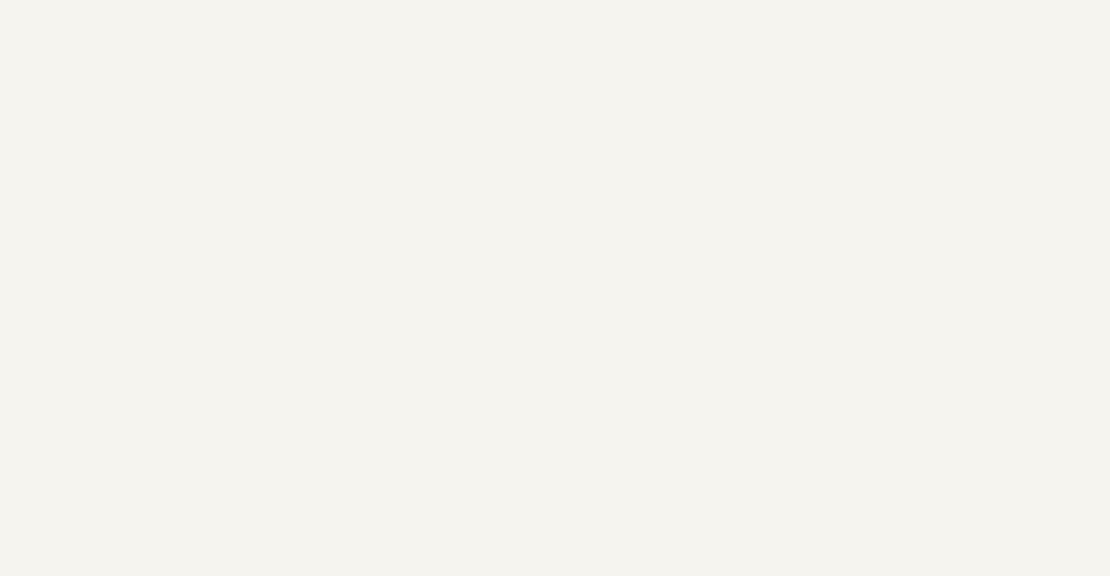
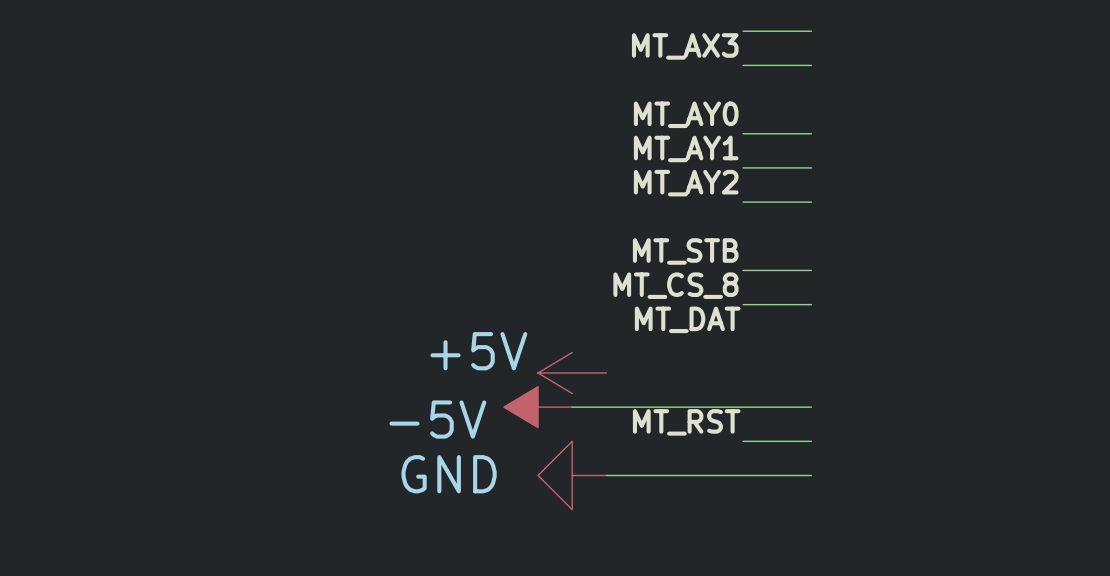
wire: none -> (743, 31) (811, 31)
label: none -> MT_AX3 (685, 46)
wire: none -> (743, 65) (811, 65)
label: none -> MT_AY0 (686, 114)
wire: none -> (743, 133) (811, 133)
label: none -> MT_AY1 (686, 148)
wire: none -> (743, 167) (811, 167)
label: none -> MT_AY2 (686, 183)
wire: none -> (743, 202) (811, 202)
label: none -> MT_STB (685, 251)
wire: none -> (743, 270) (811, 270)
label: none -> MT_CS_8 (675, 285)
wire: none -> (743, 304) (811, 304)
label: none -> MT_DAT (687, 319)
power symbol: none -> +5V (572, 372)
power symbol: none -> -5V (538, 407)
wire: none -> (572, 407) (811, 407)
label: none -> MT_RST (686, 422)
wire: none -> (743, 441) (811, 441)
power symbol: none -> GND (572, 475)
wire: none -> (606, 475) (811, 475)

